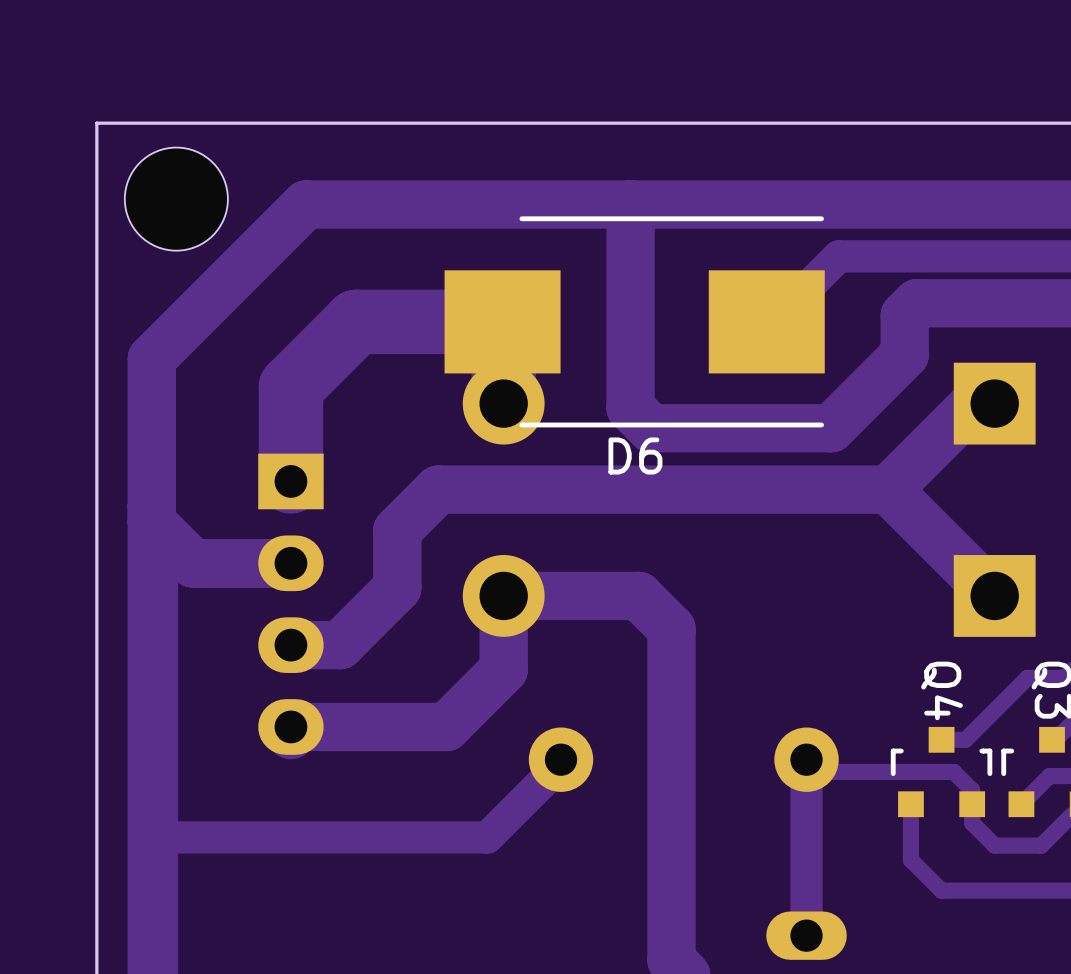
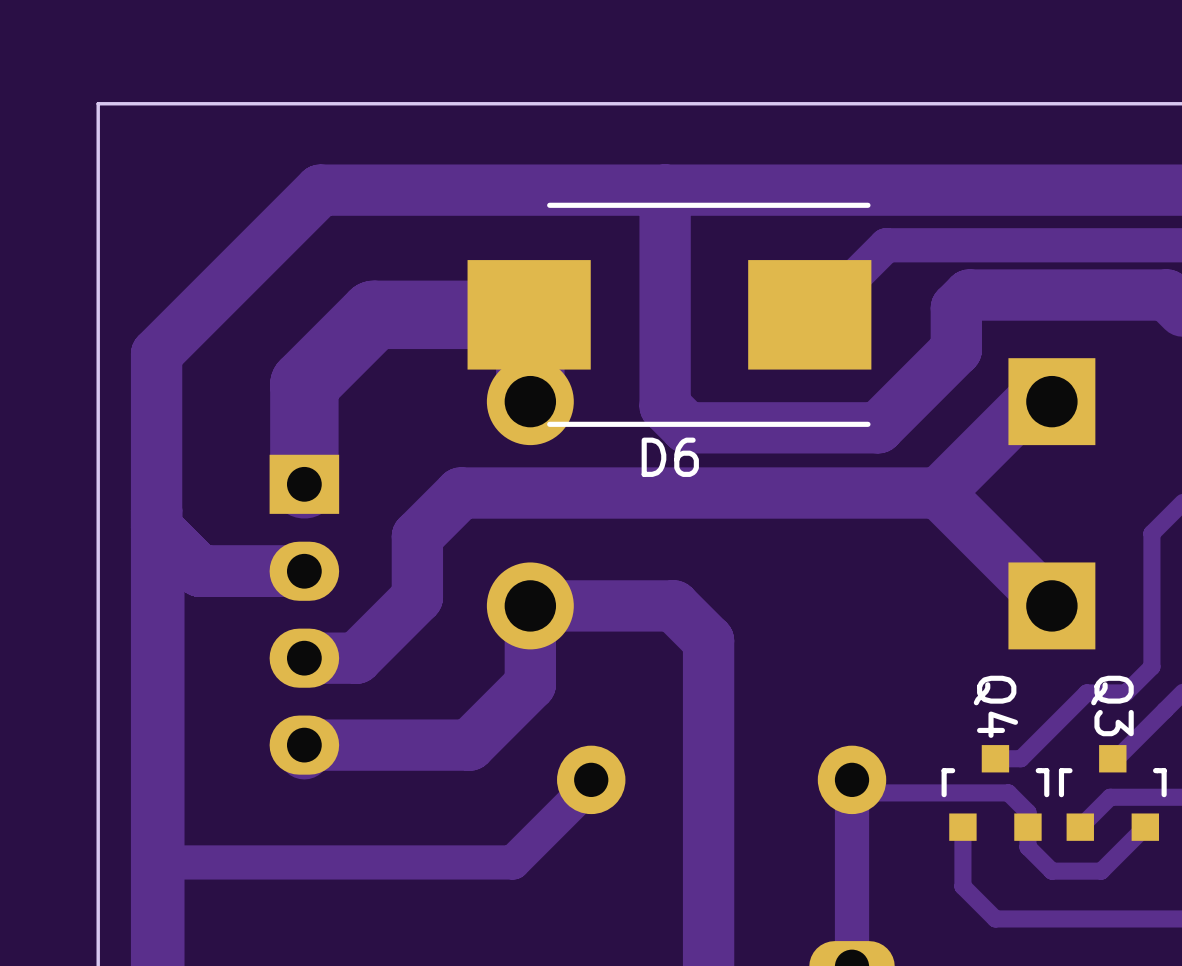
part: (176, 199) -> none

